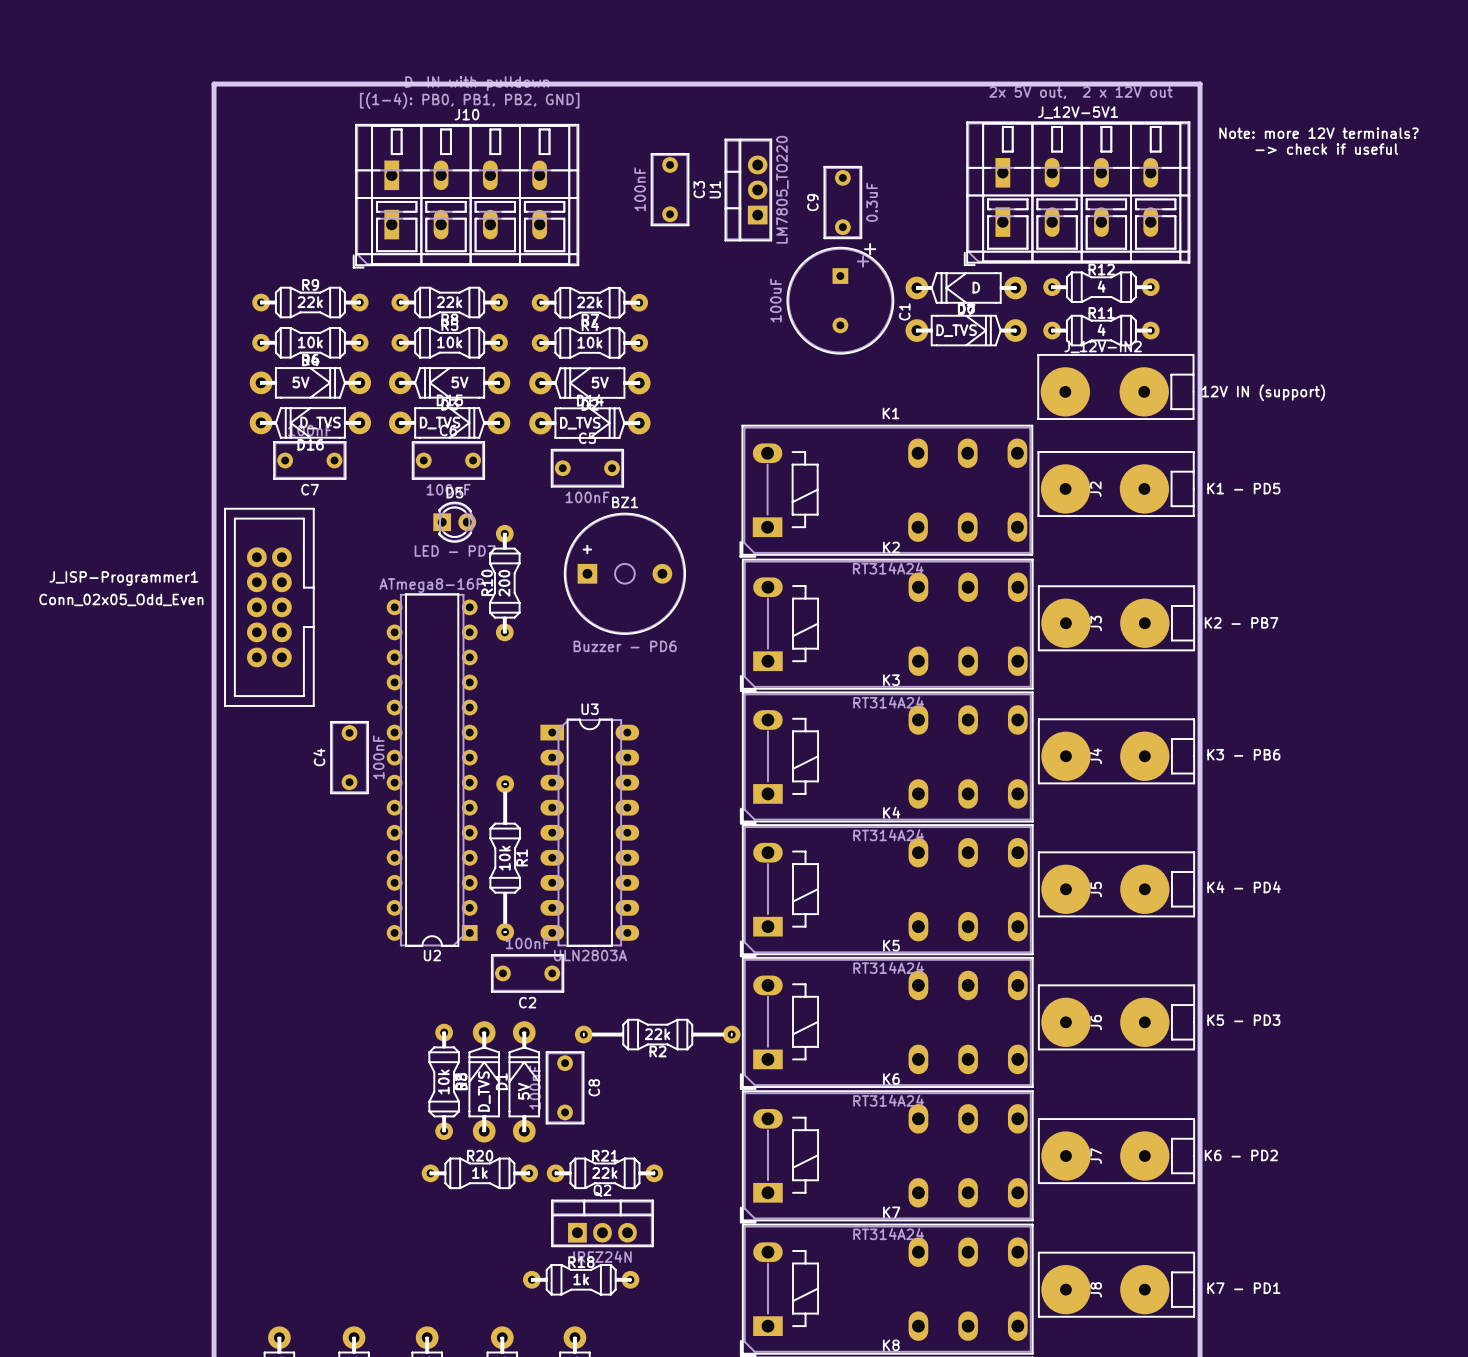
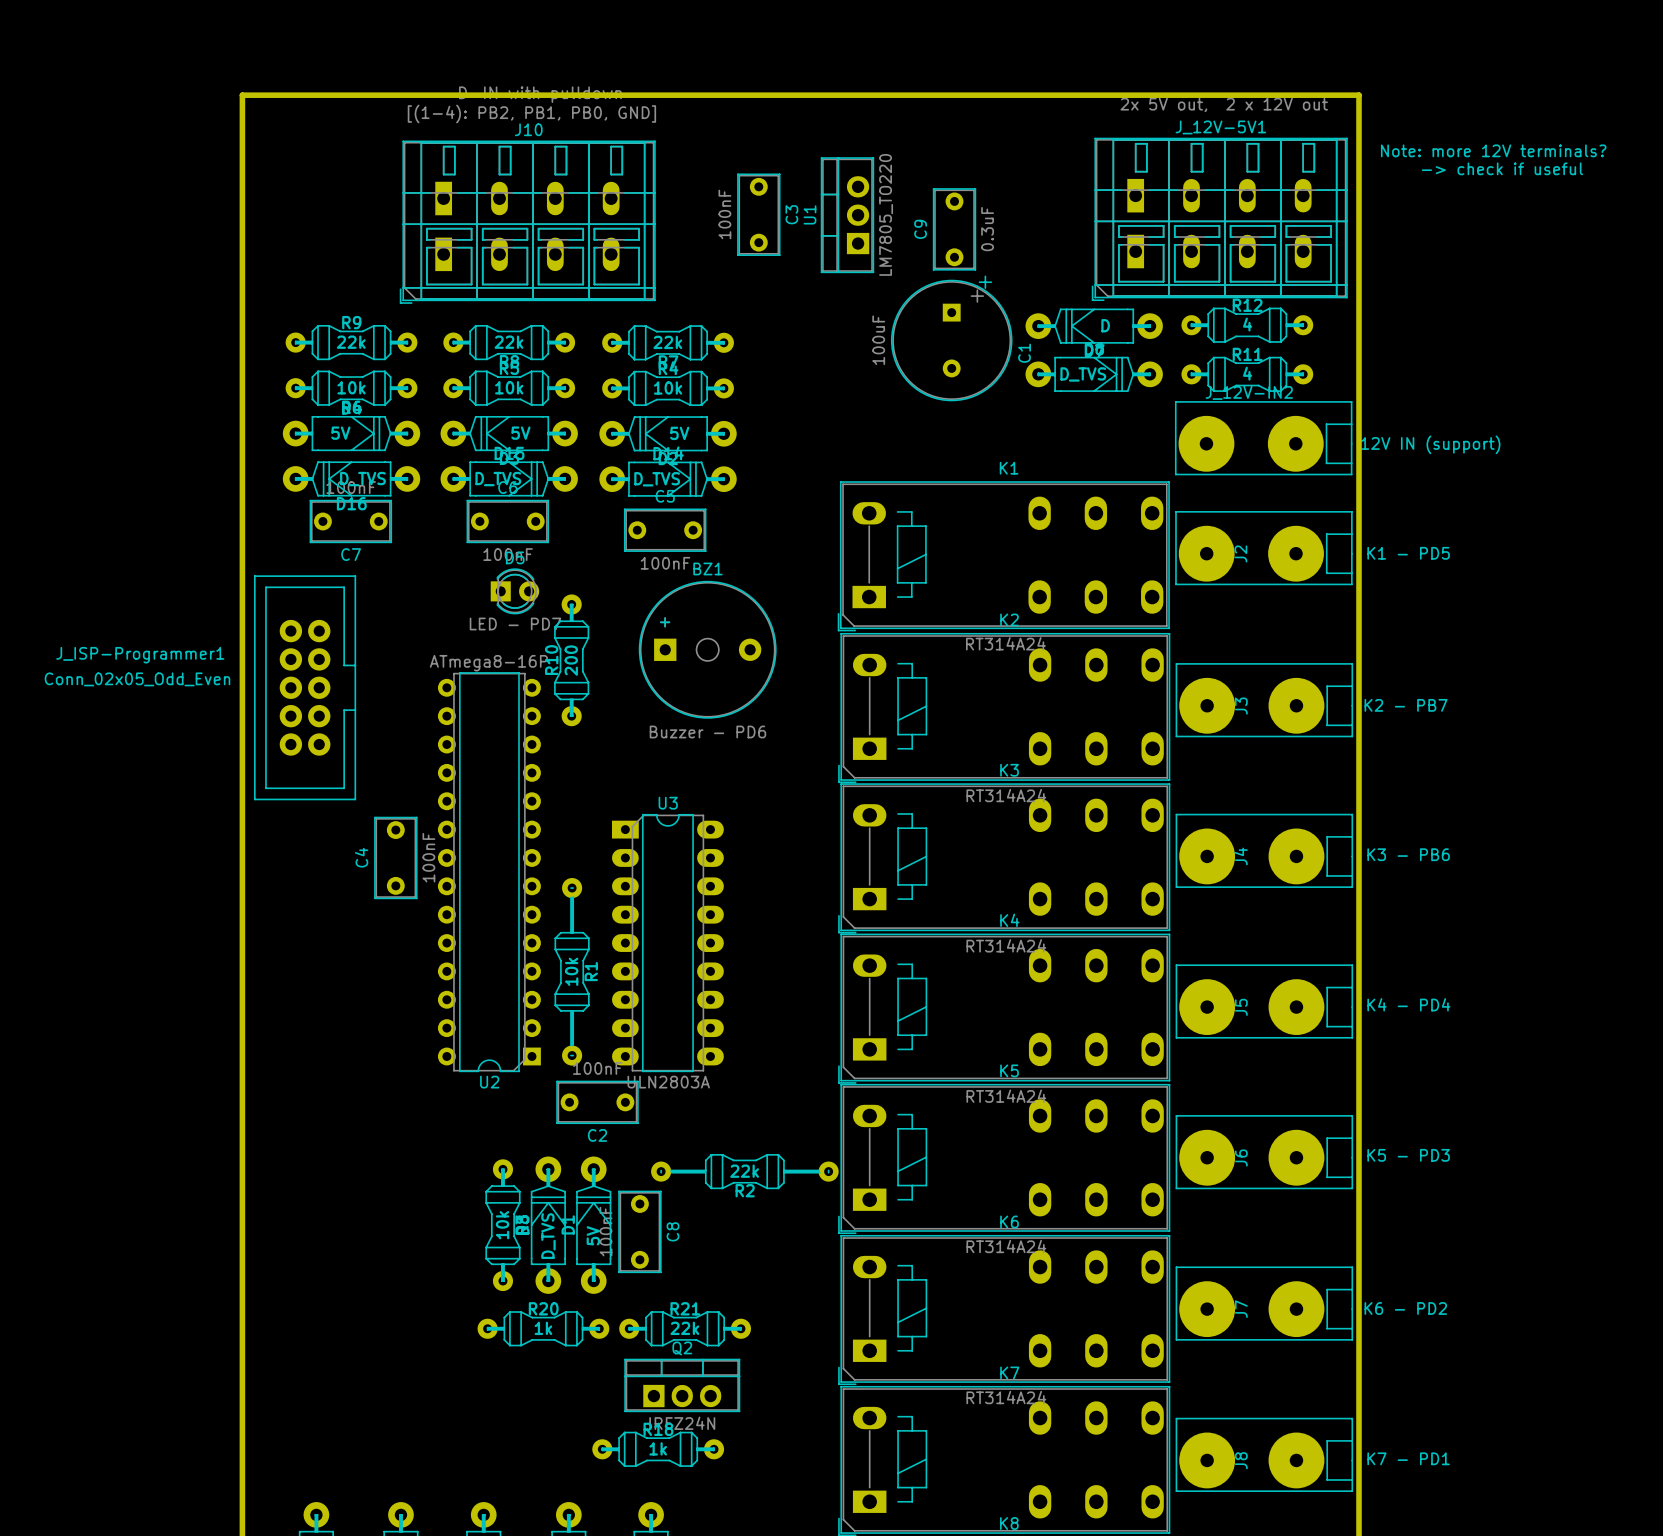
J10 text: [(1-4): PB0, PB1, PB2, GND] (469, 100) -> [(1-4): PB2, PB1, PB0, GND] (531, 113)

